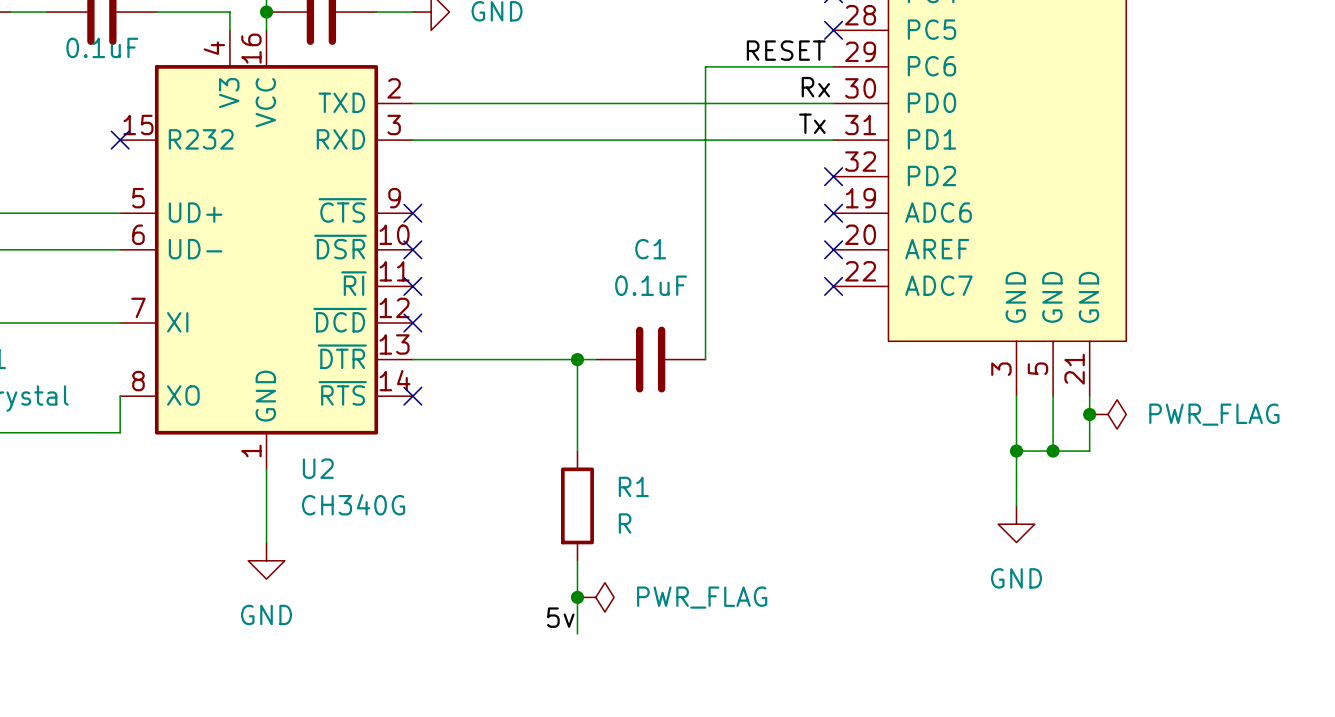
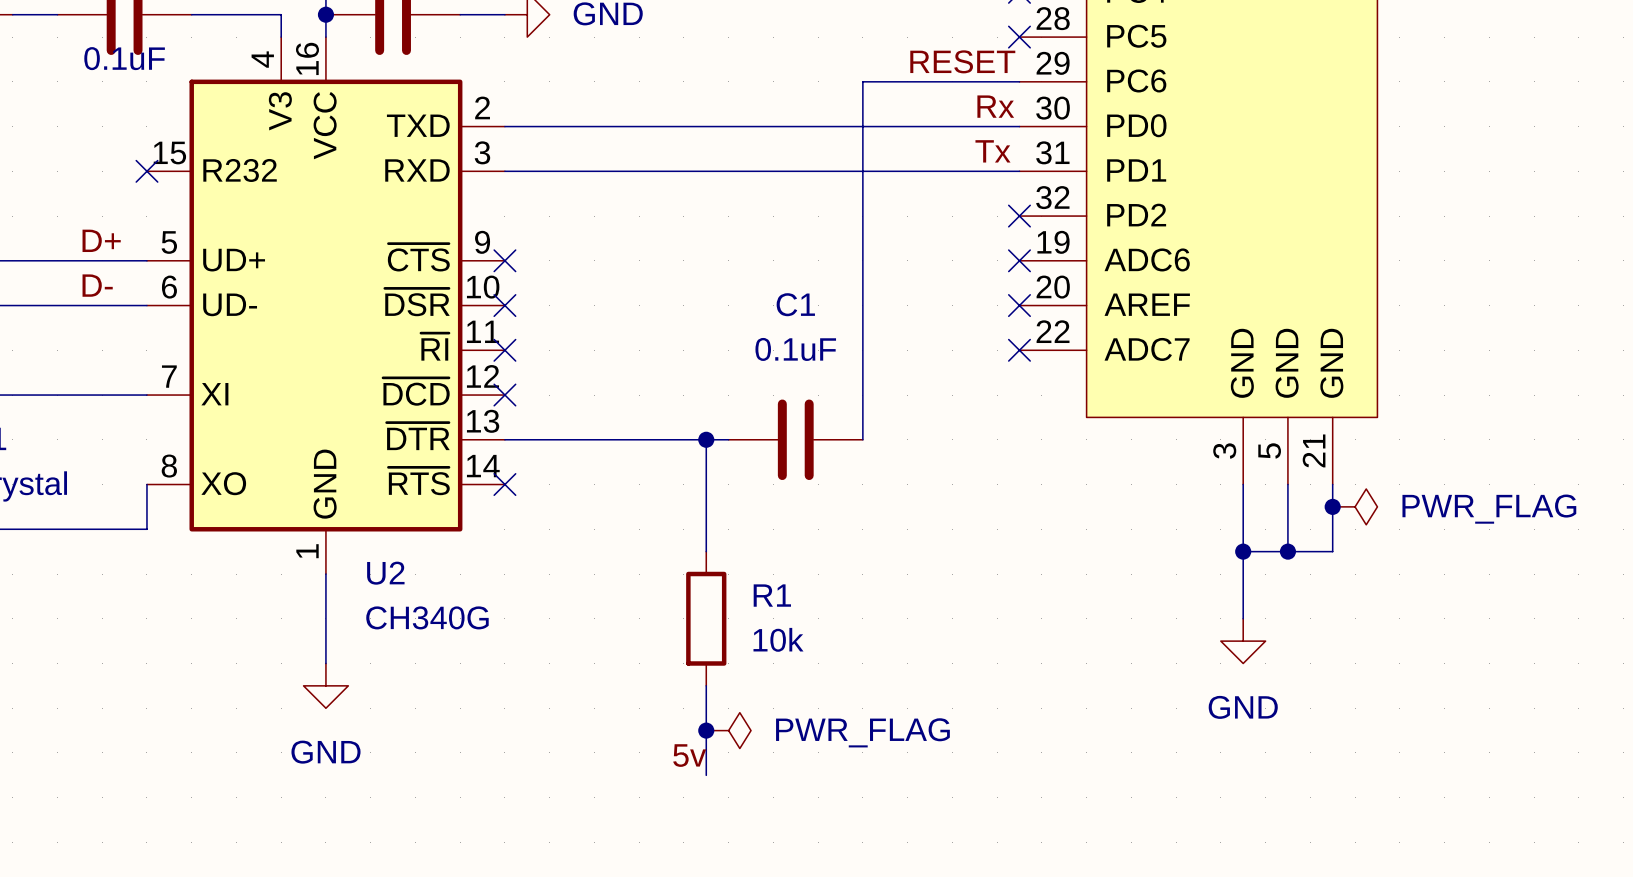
label: none -> D+ (101, 240)
label: none -> D- (97, 285)
R1 value: R (625, 523) -> 10k (778, 639)

